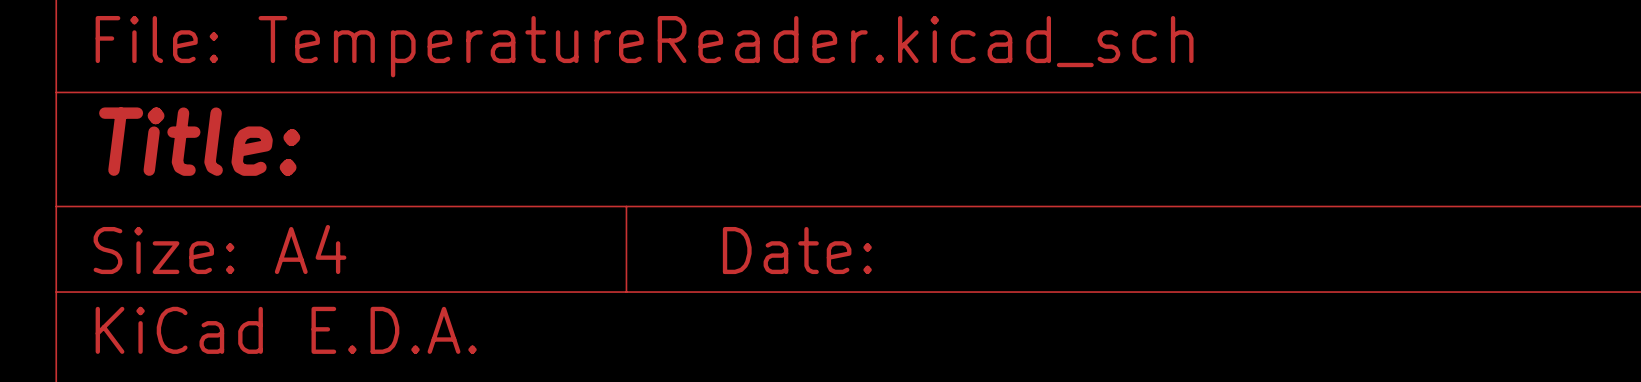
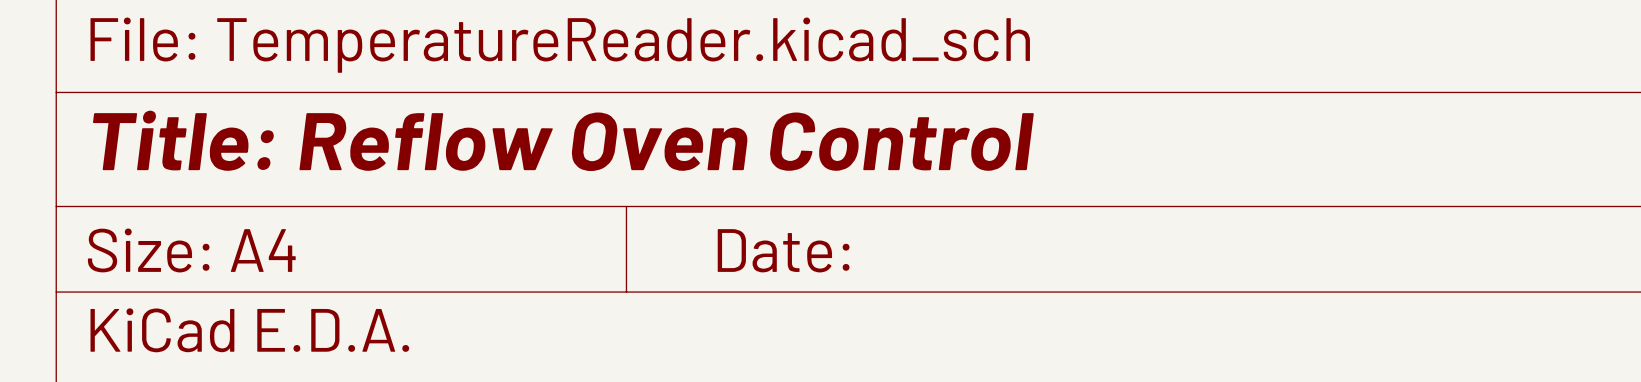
title block: Title: (199, 141) -> Title: Reflow Oven Control (563, 140)

